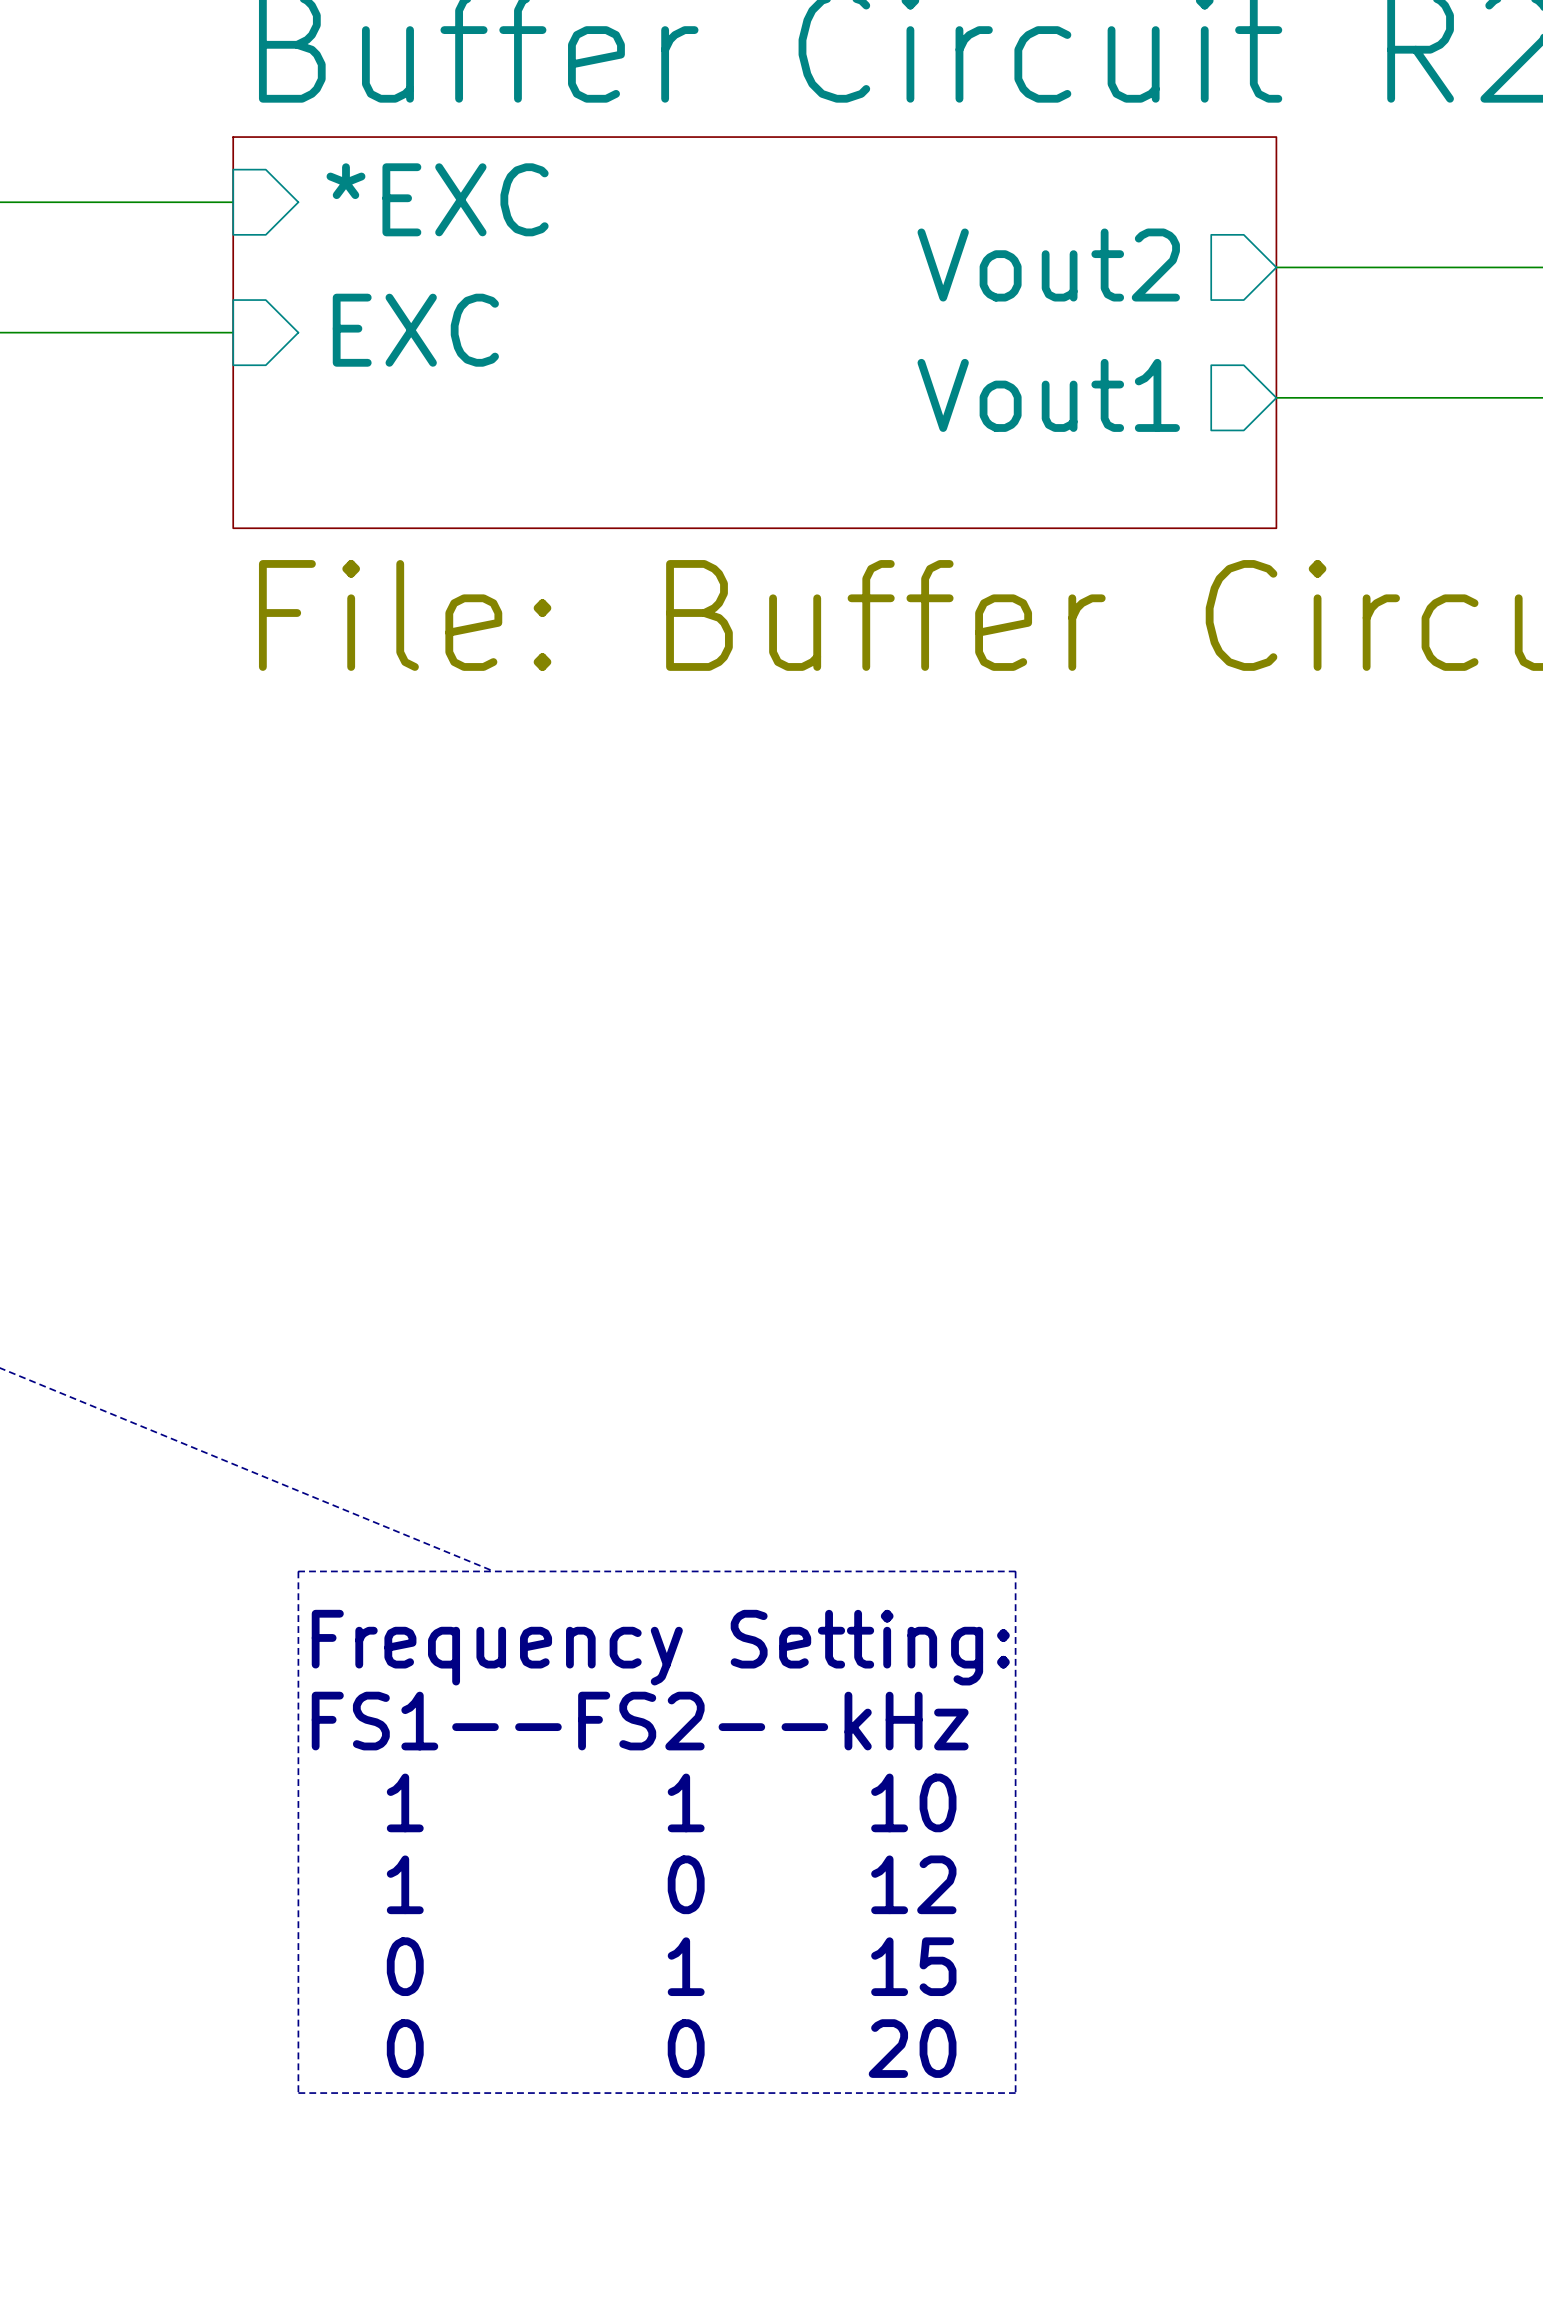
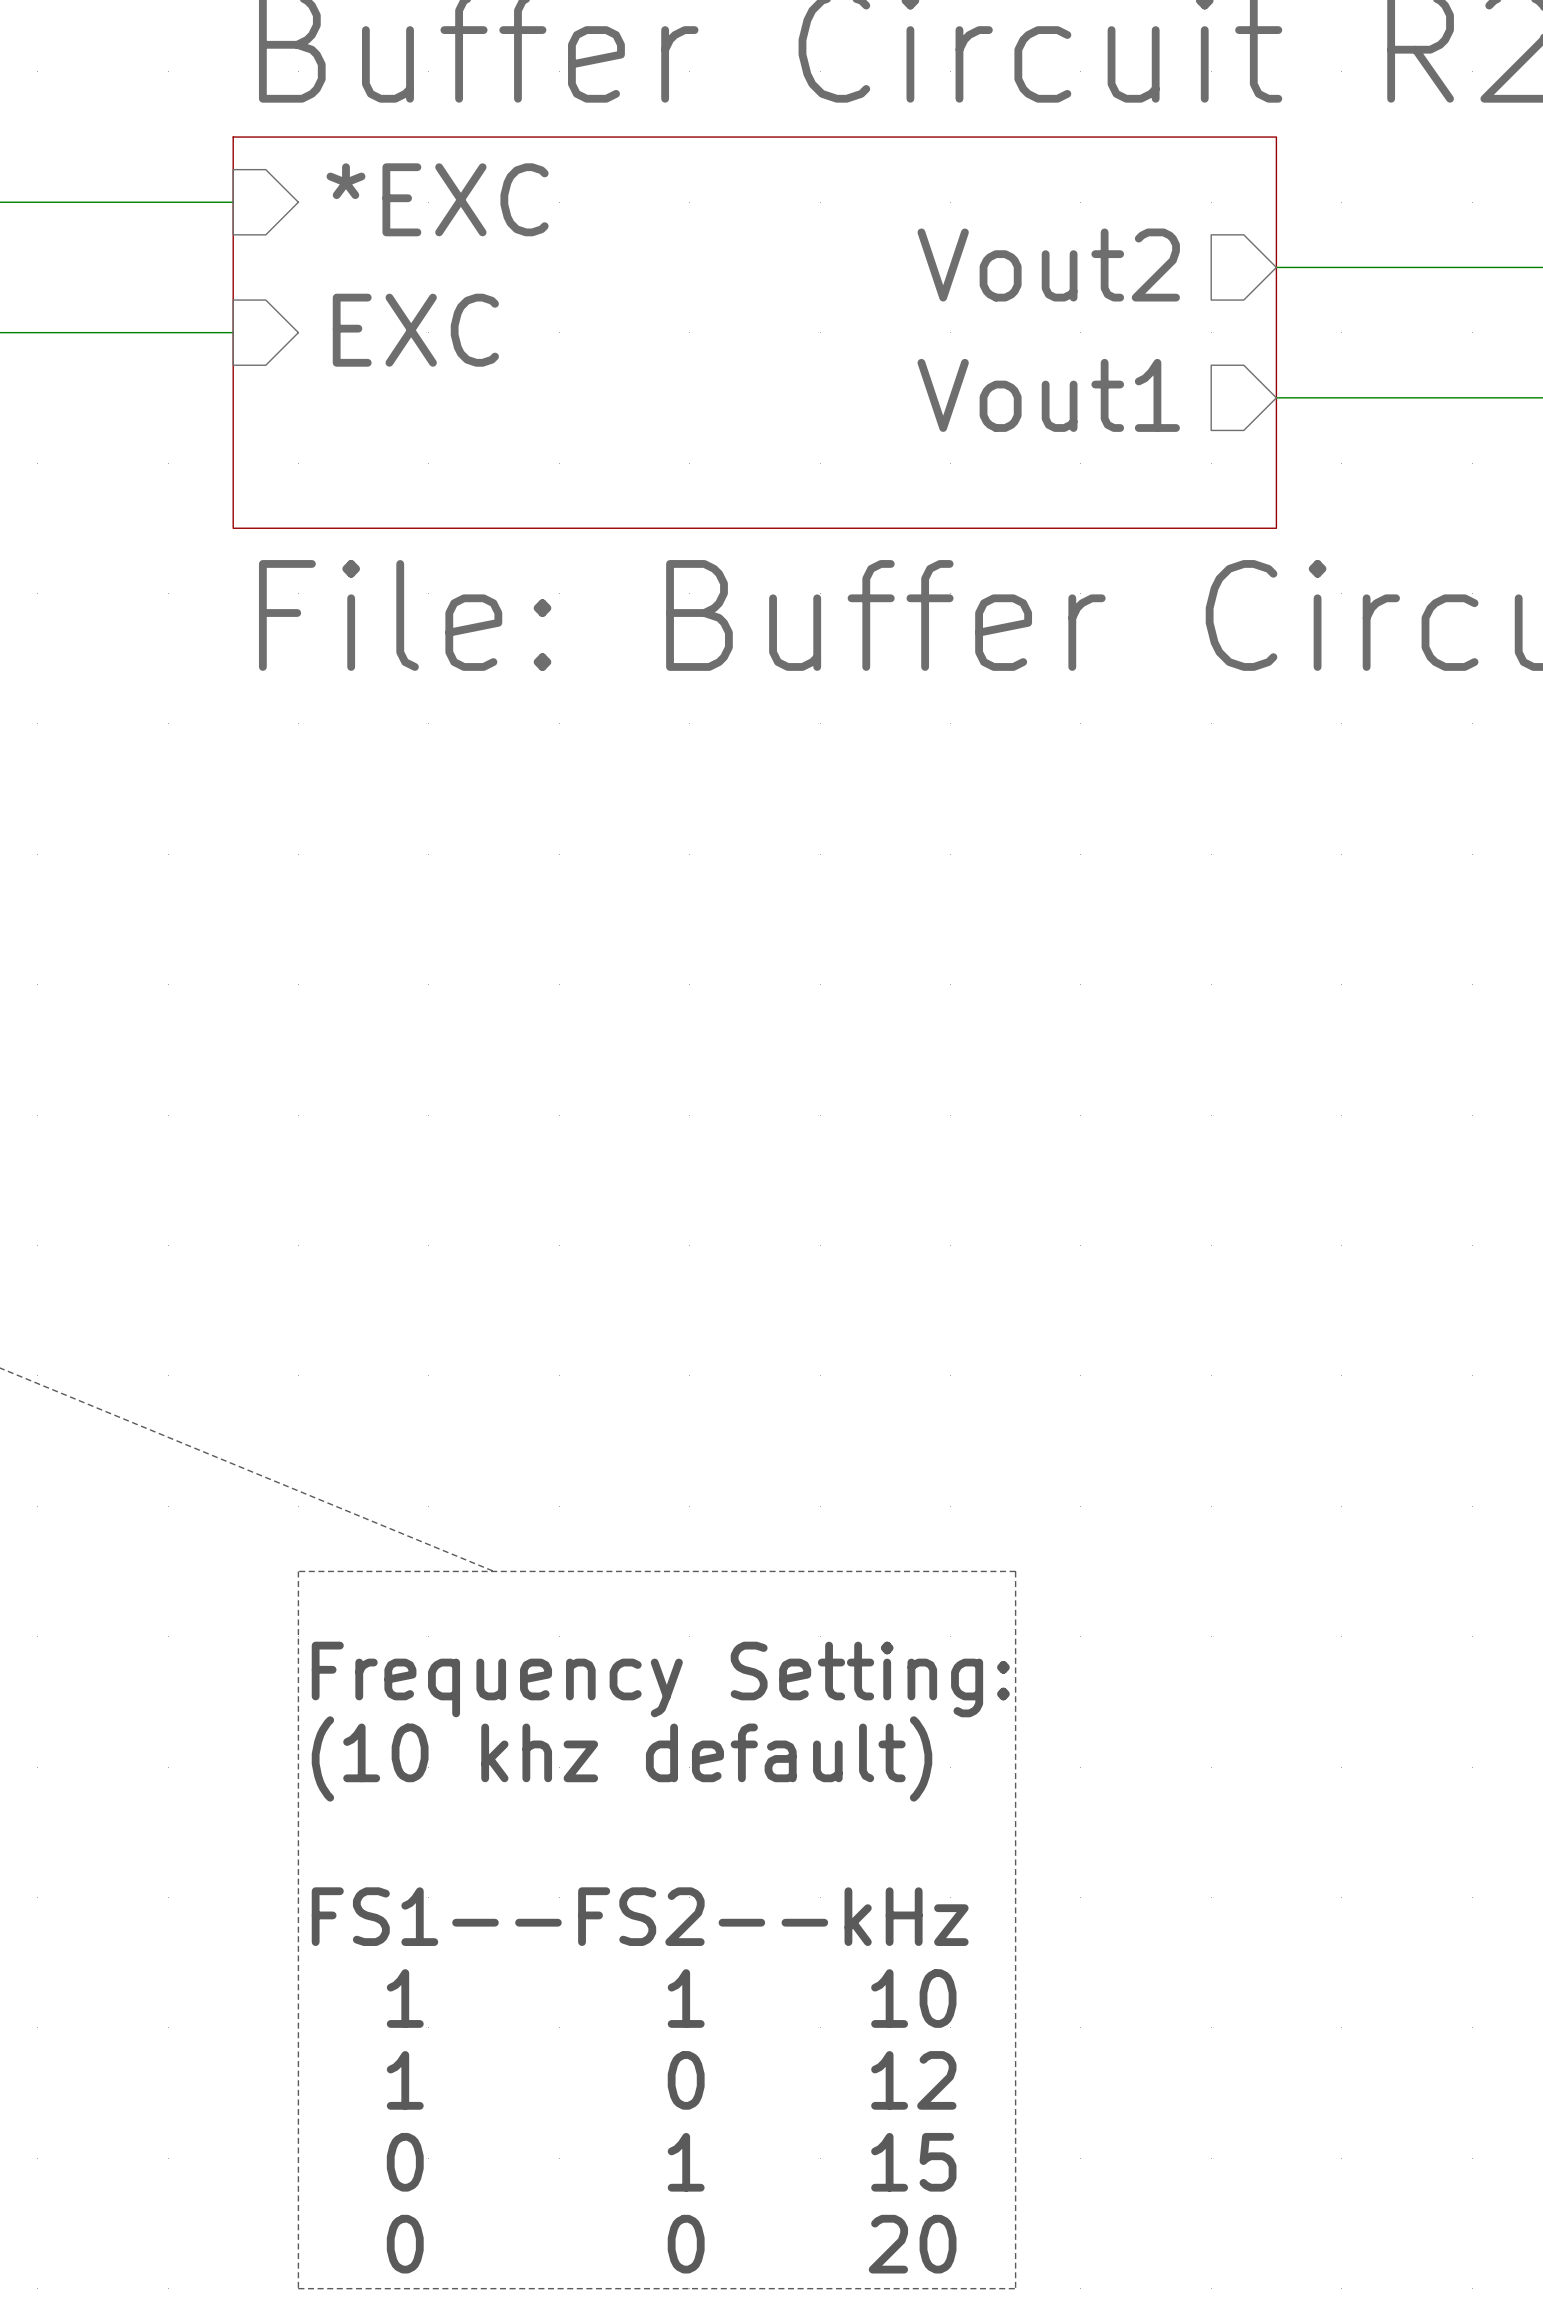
text position: Frequency Setting: (660, 1647) -> Frequency Setting: (660, 1679)
text position: FS1--FS2--kHz (640, 1721) -> FS1--FS2--kHz (640, 1916)
text: none -> (10 khz default) (622, 1758)
text position: 1 1 10 (671, 1802) -> 1 1 10 (671, 1998)
text position: 1 0 12 (671, 1884) -> 1 0 12 (671, 2080)
text position: 0 1 15 (671, 1966) -> 0 1 15 (671, 2162)
text position: 0 0 20 (671, 2048) -> 0 0 20 (671, 2244)
line: (298, 2093) (1015, 2093) -> (298, 2093) (298, 2288) (1015, 2288) (1015, 2093)

